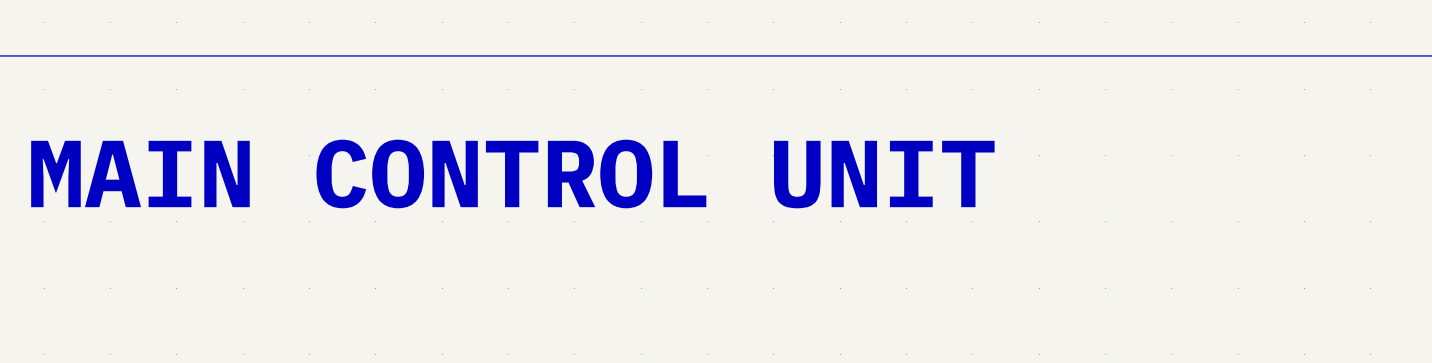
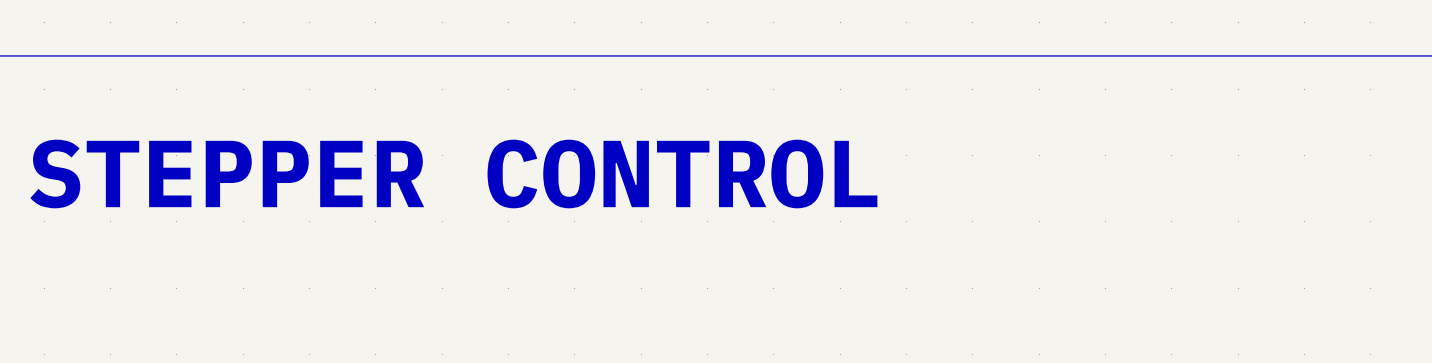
text: MAIN CONTROL UNIT (512, 173) -> STEPPER CONTROL (453, 173)

